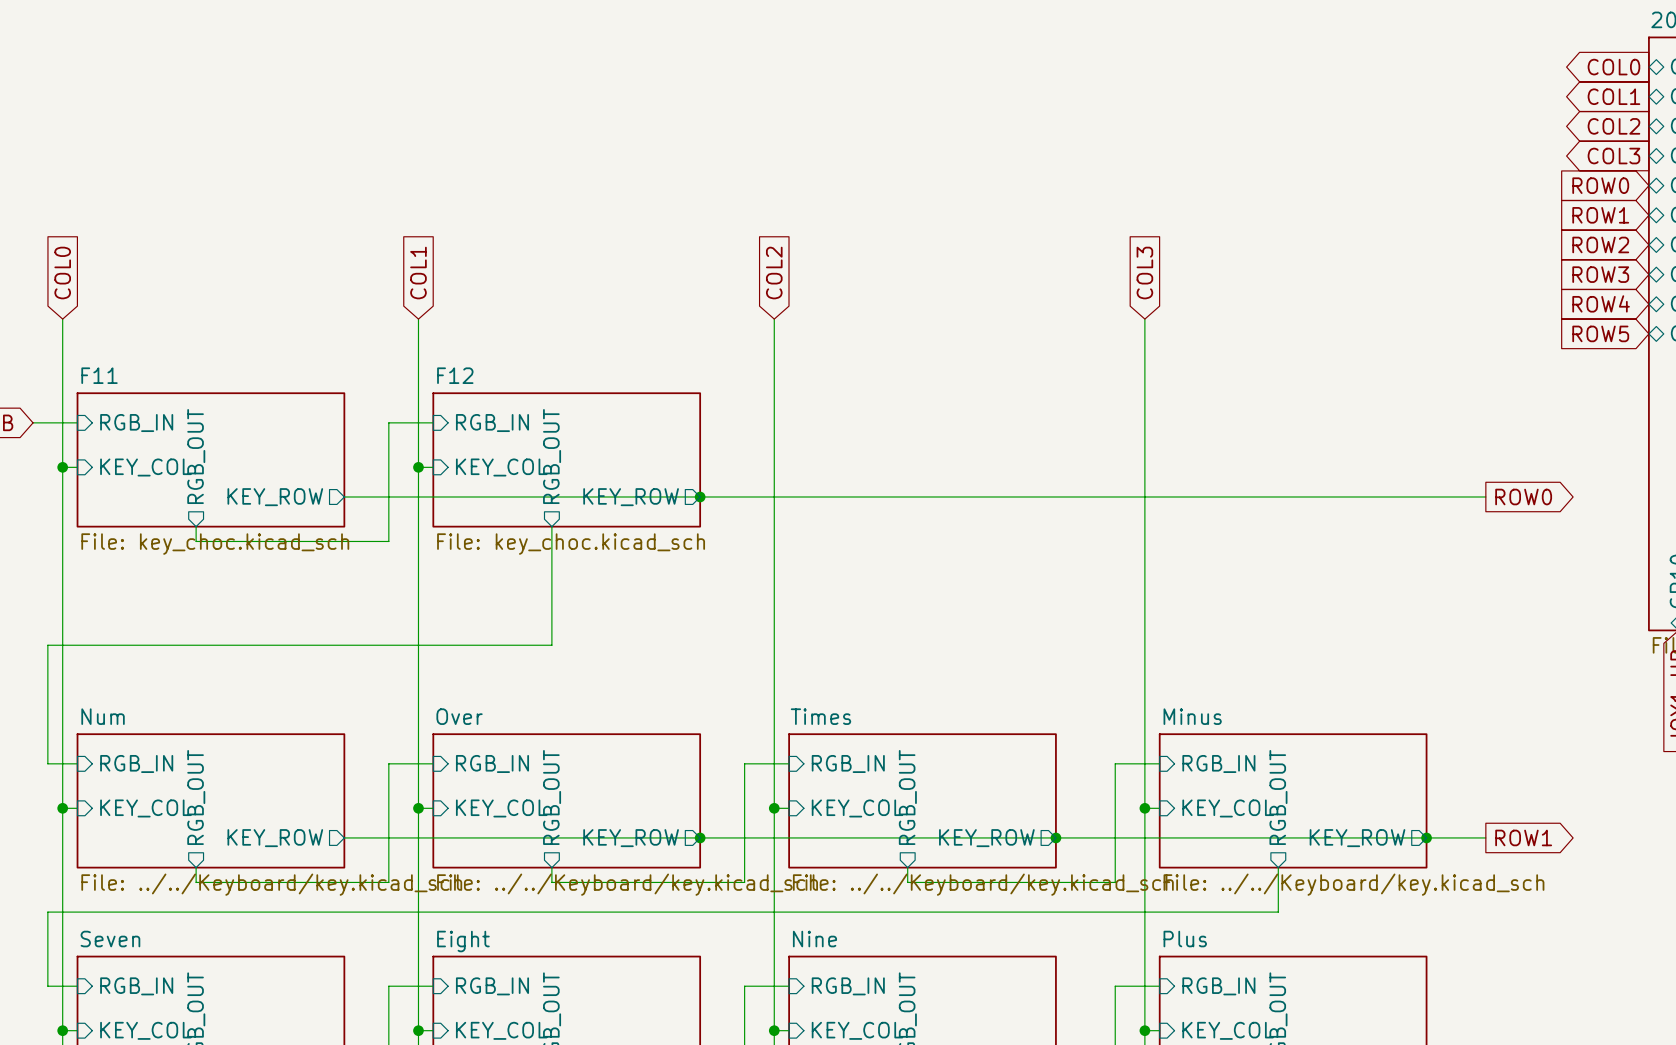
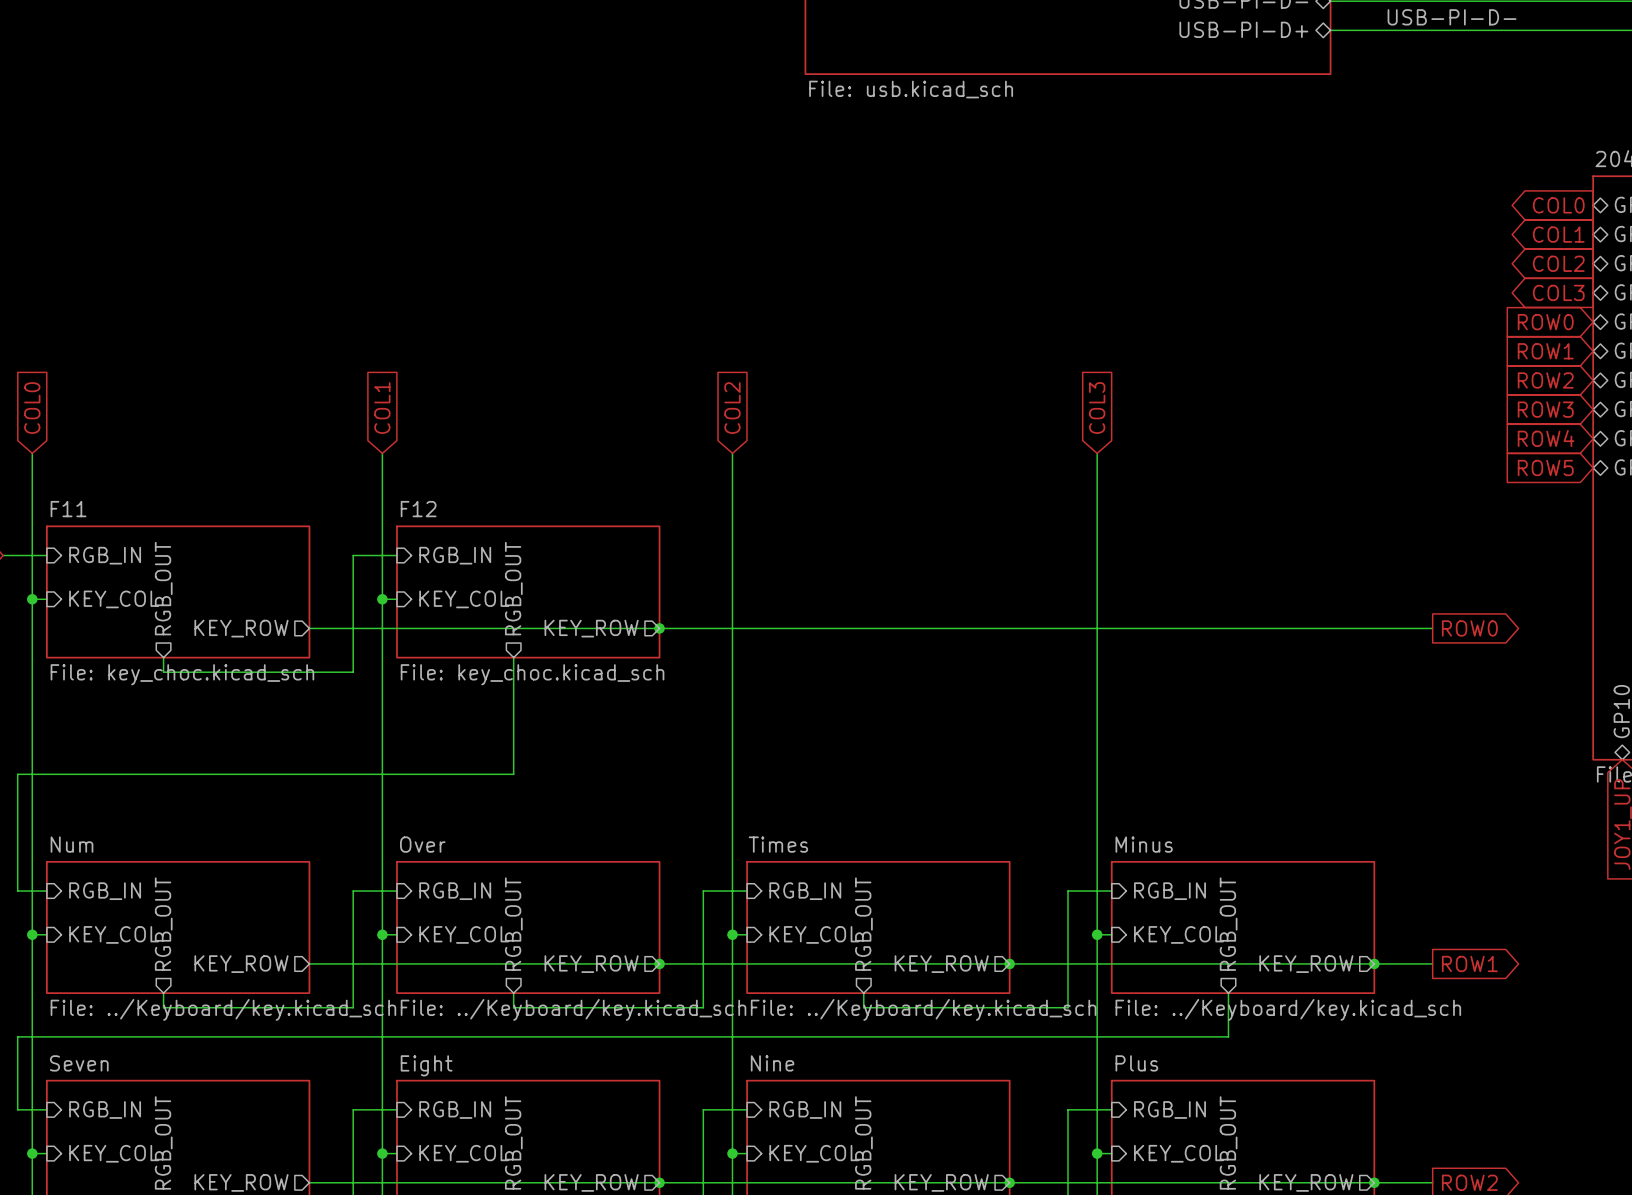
sheet Num value: File: ../../Keyboard/key.kicad_sch (271, 884) -> File: ../Keyboard/key.kicad_sch (223, 1009)
sheet Over value: File: ../../Keyboard/key.kicad_sch (627, 884) -> File: ../Keyboard/key.kicad_sch (573, 1009)
sheet Times value: File: ../../Keyboard/key.kicad_sch (983, 884) -> File: ../Keyboard/key.kicad_sch (923, 1009)
sheet Minus value: File: ../../Keyboard/key.kicad_sch (1353, 884) -> File: ../Keyboard/key.kicad_sch (1288, 1009)

